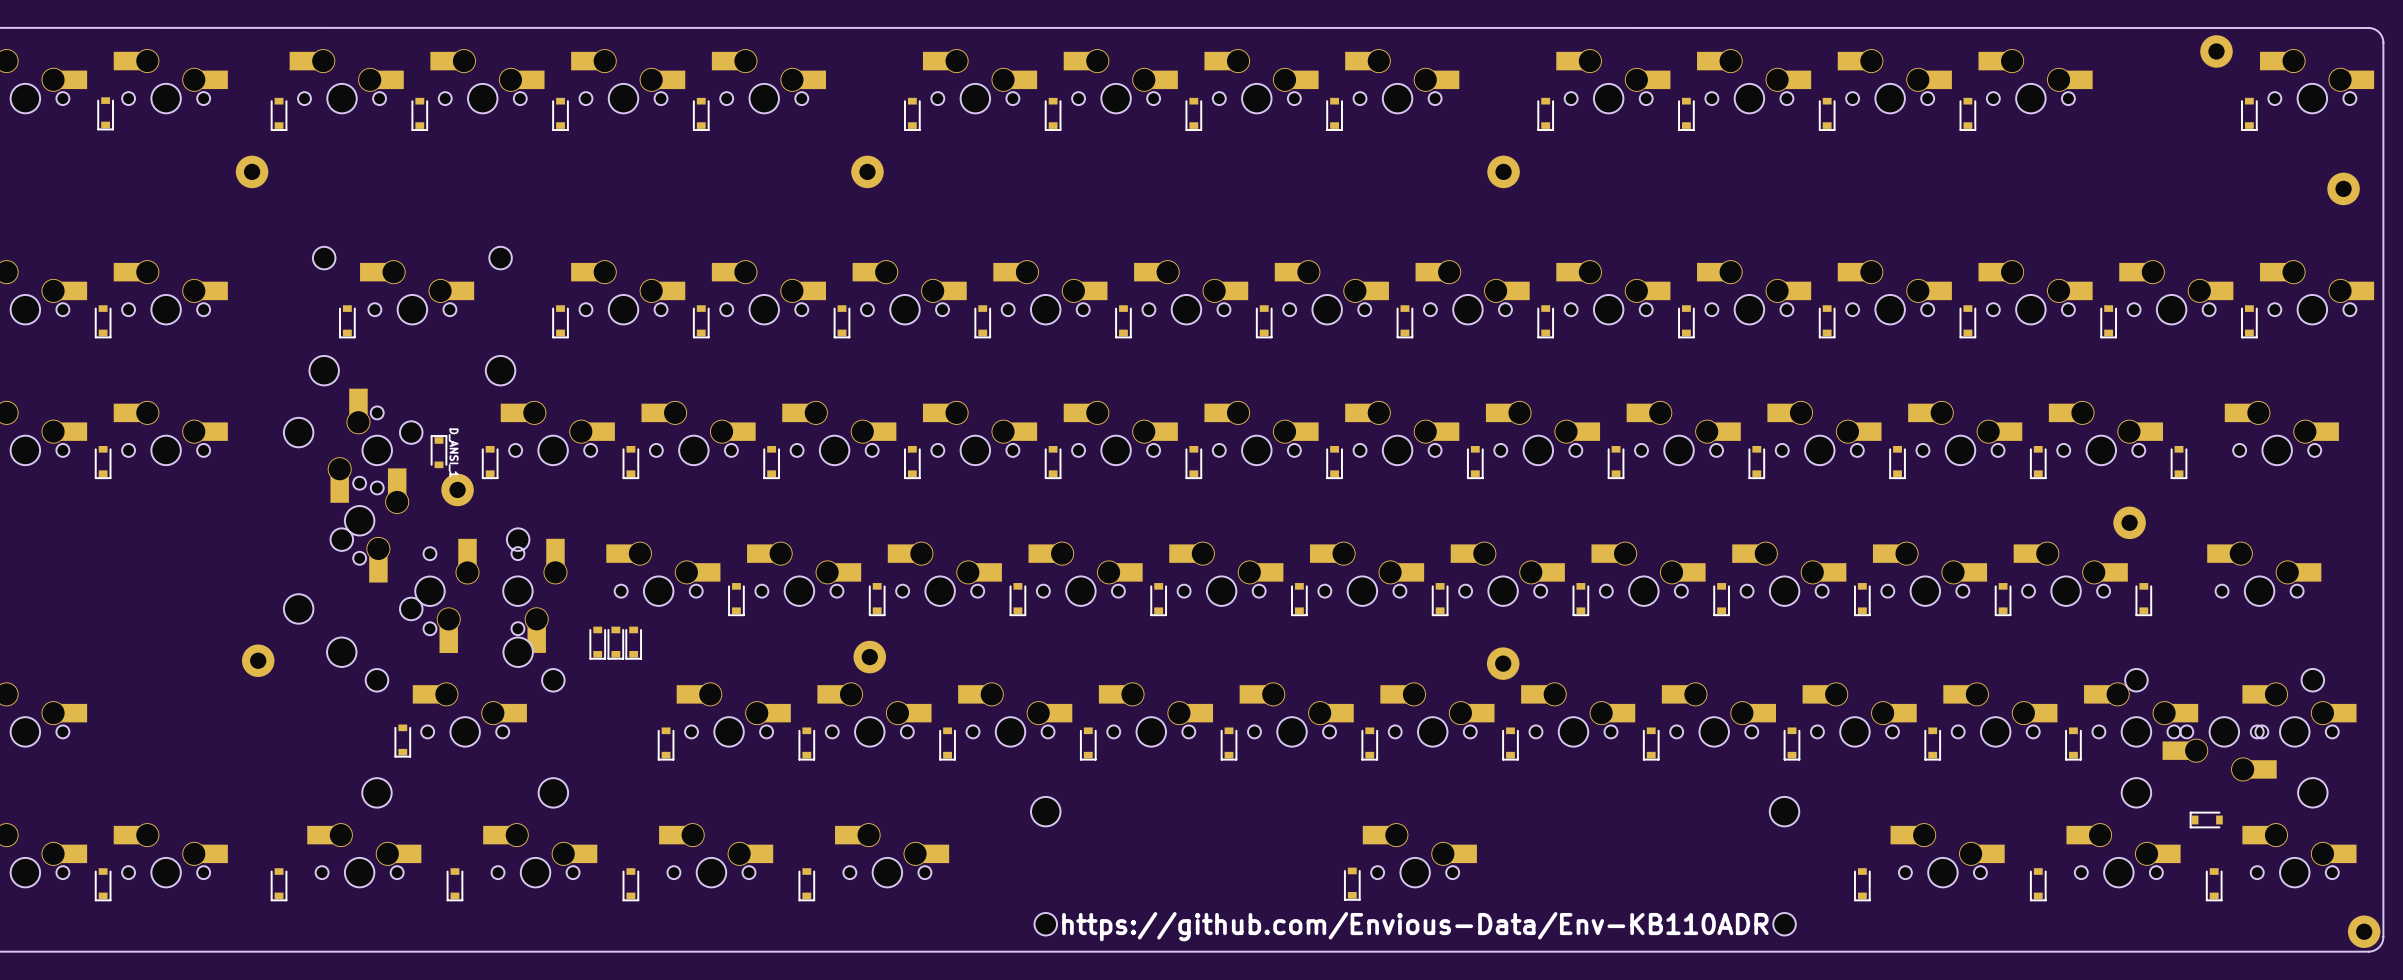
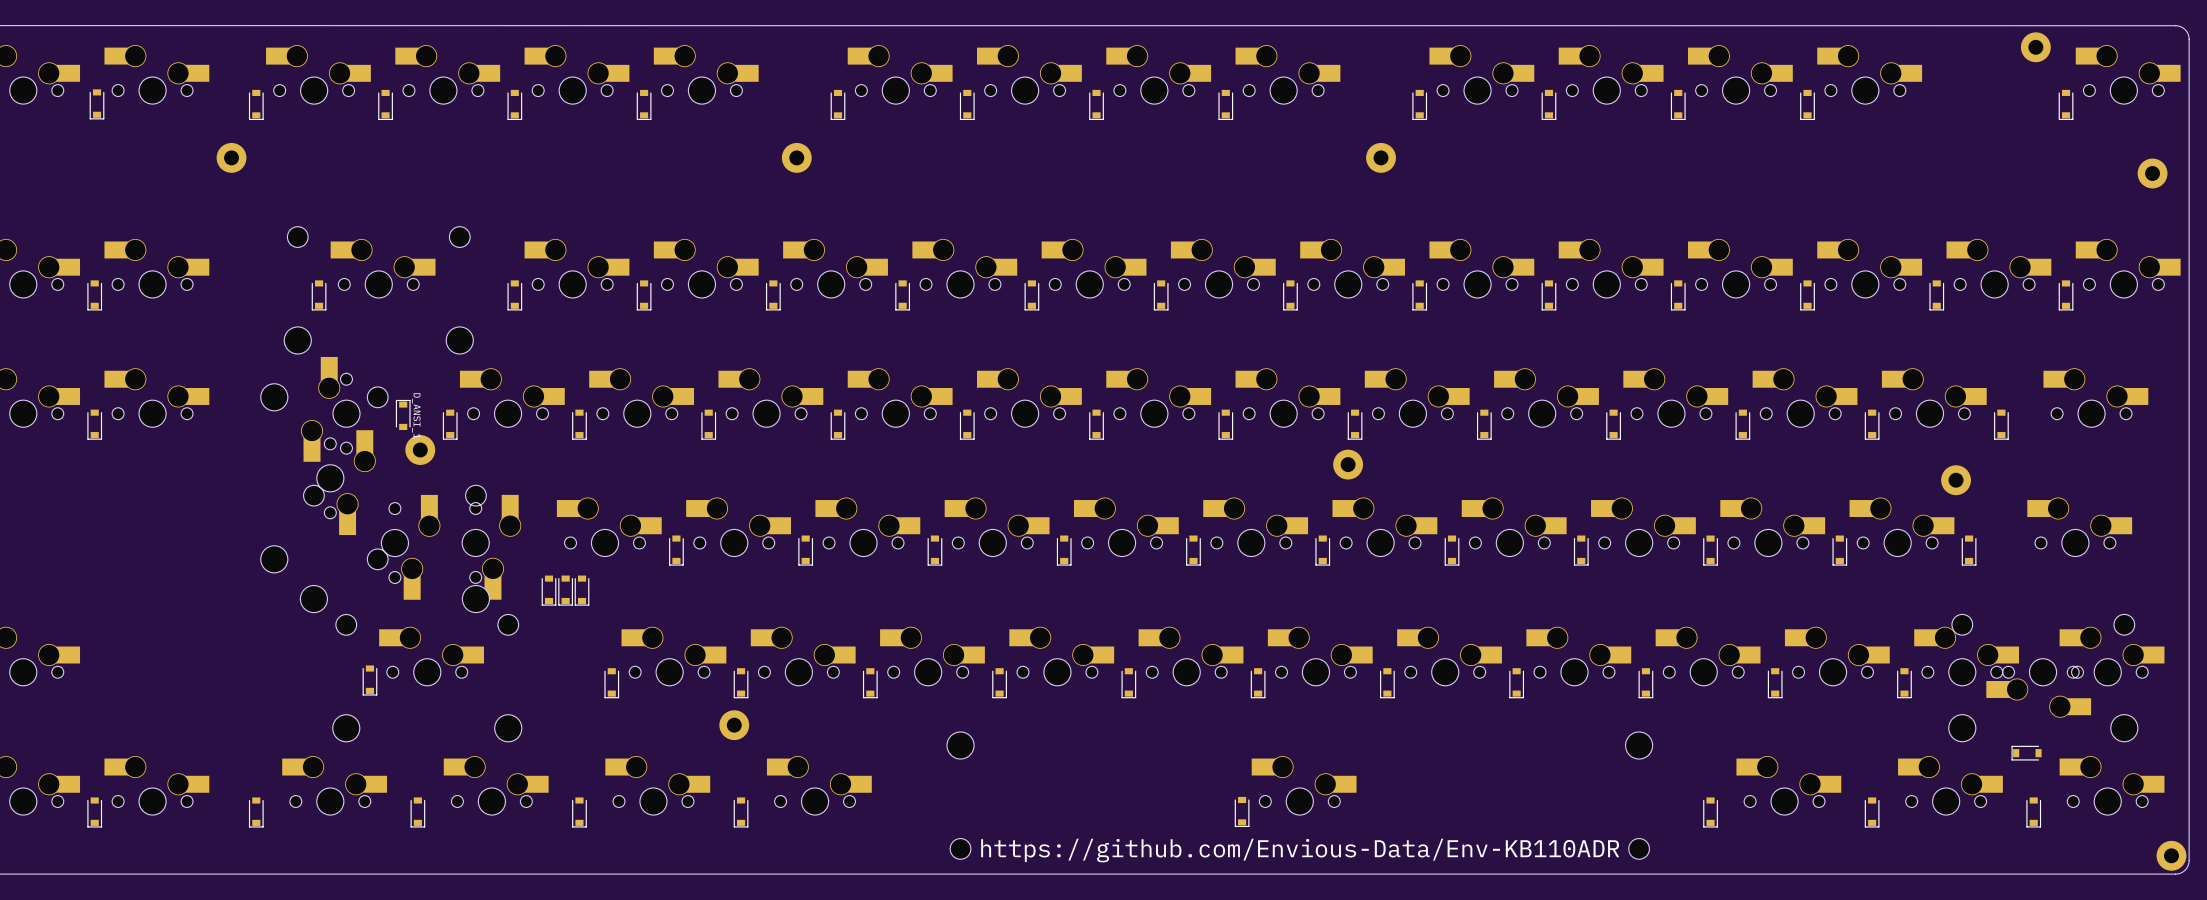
part position: (869, 657) -> (734, 725)
part: (258, 660) -> none
part position: (1503, 663) -> (1348, 464)

